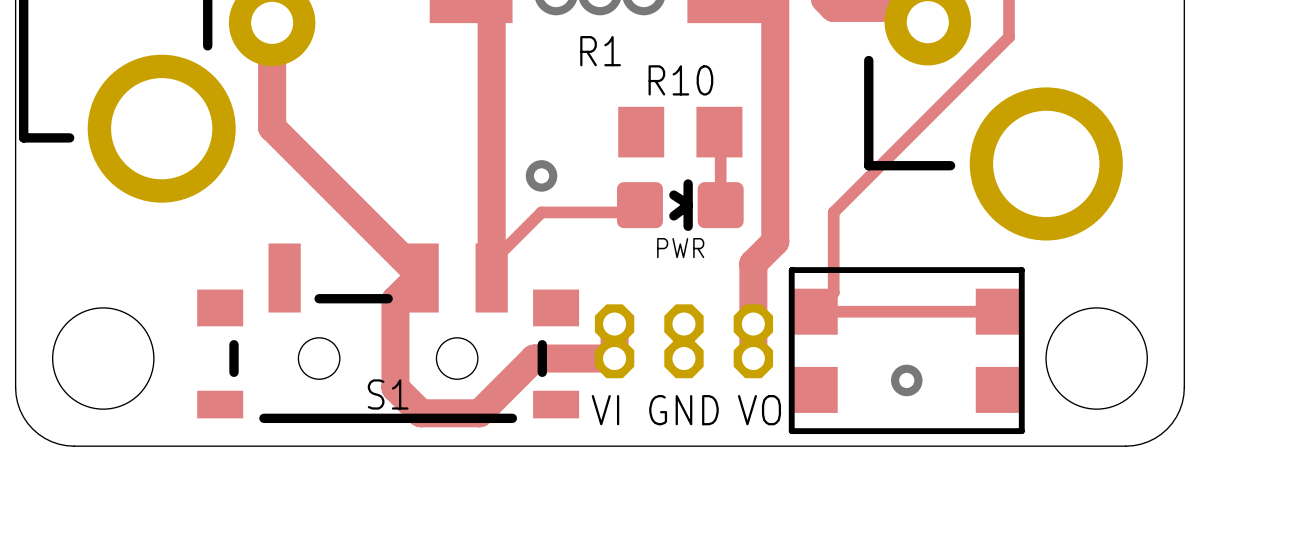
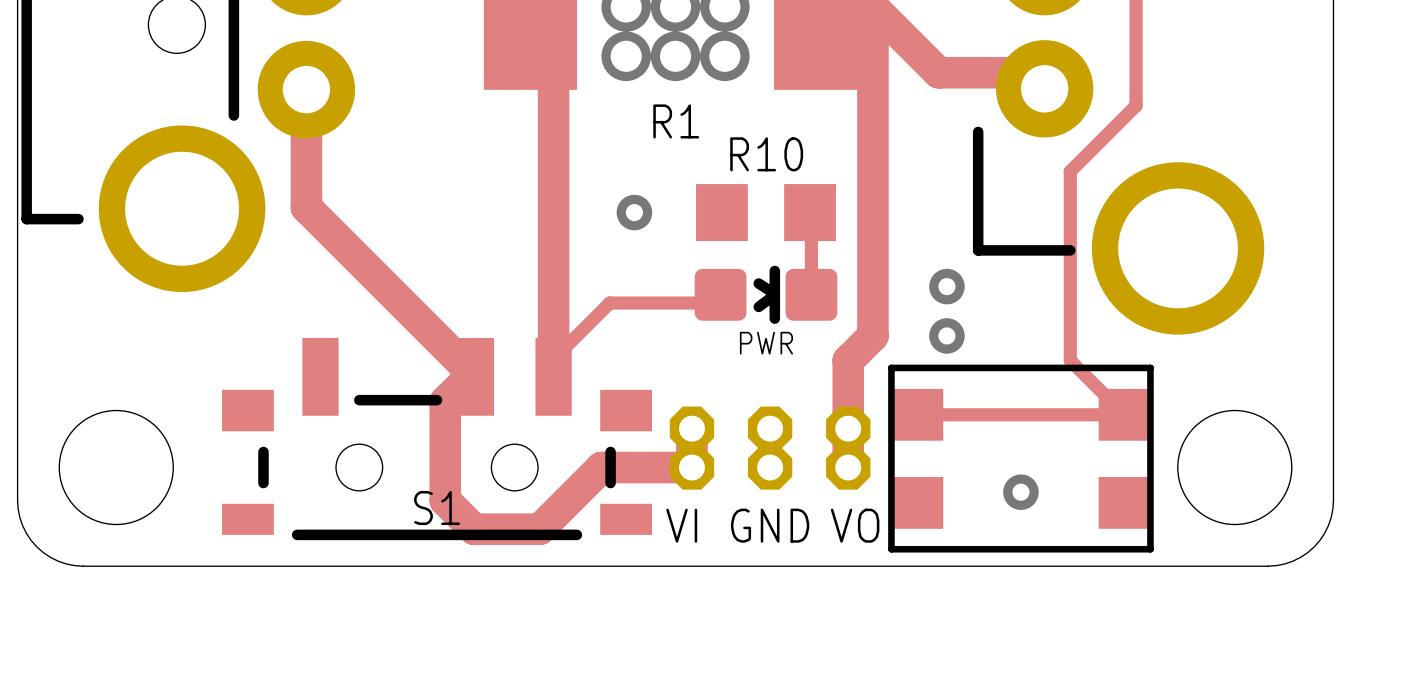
track: (950, 95) (833, 212) (833, 292) (814, 311) -> (1070, 171) (1070, 360) (1124, 414)
via position: (541, 175) -> (634, 212)
via: none -> (946, 286)
via: none -> (946, 335)

